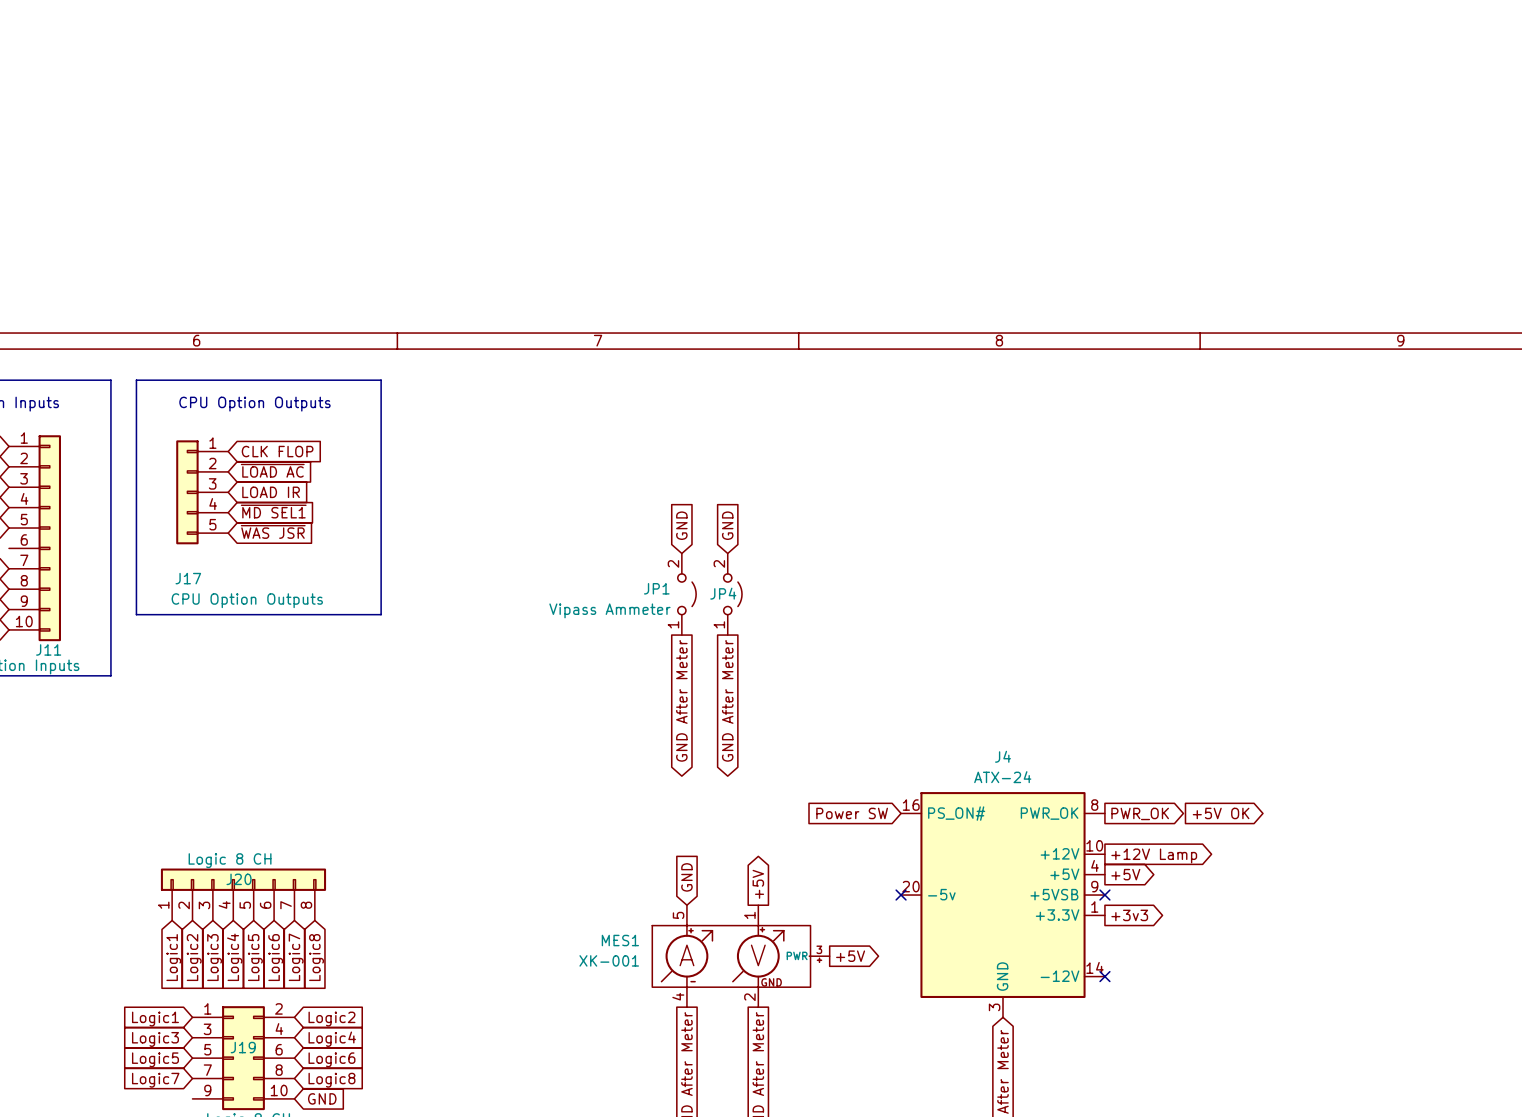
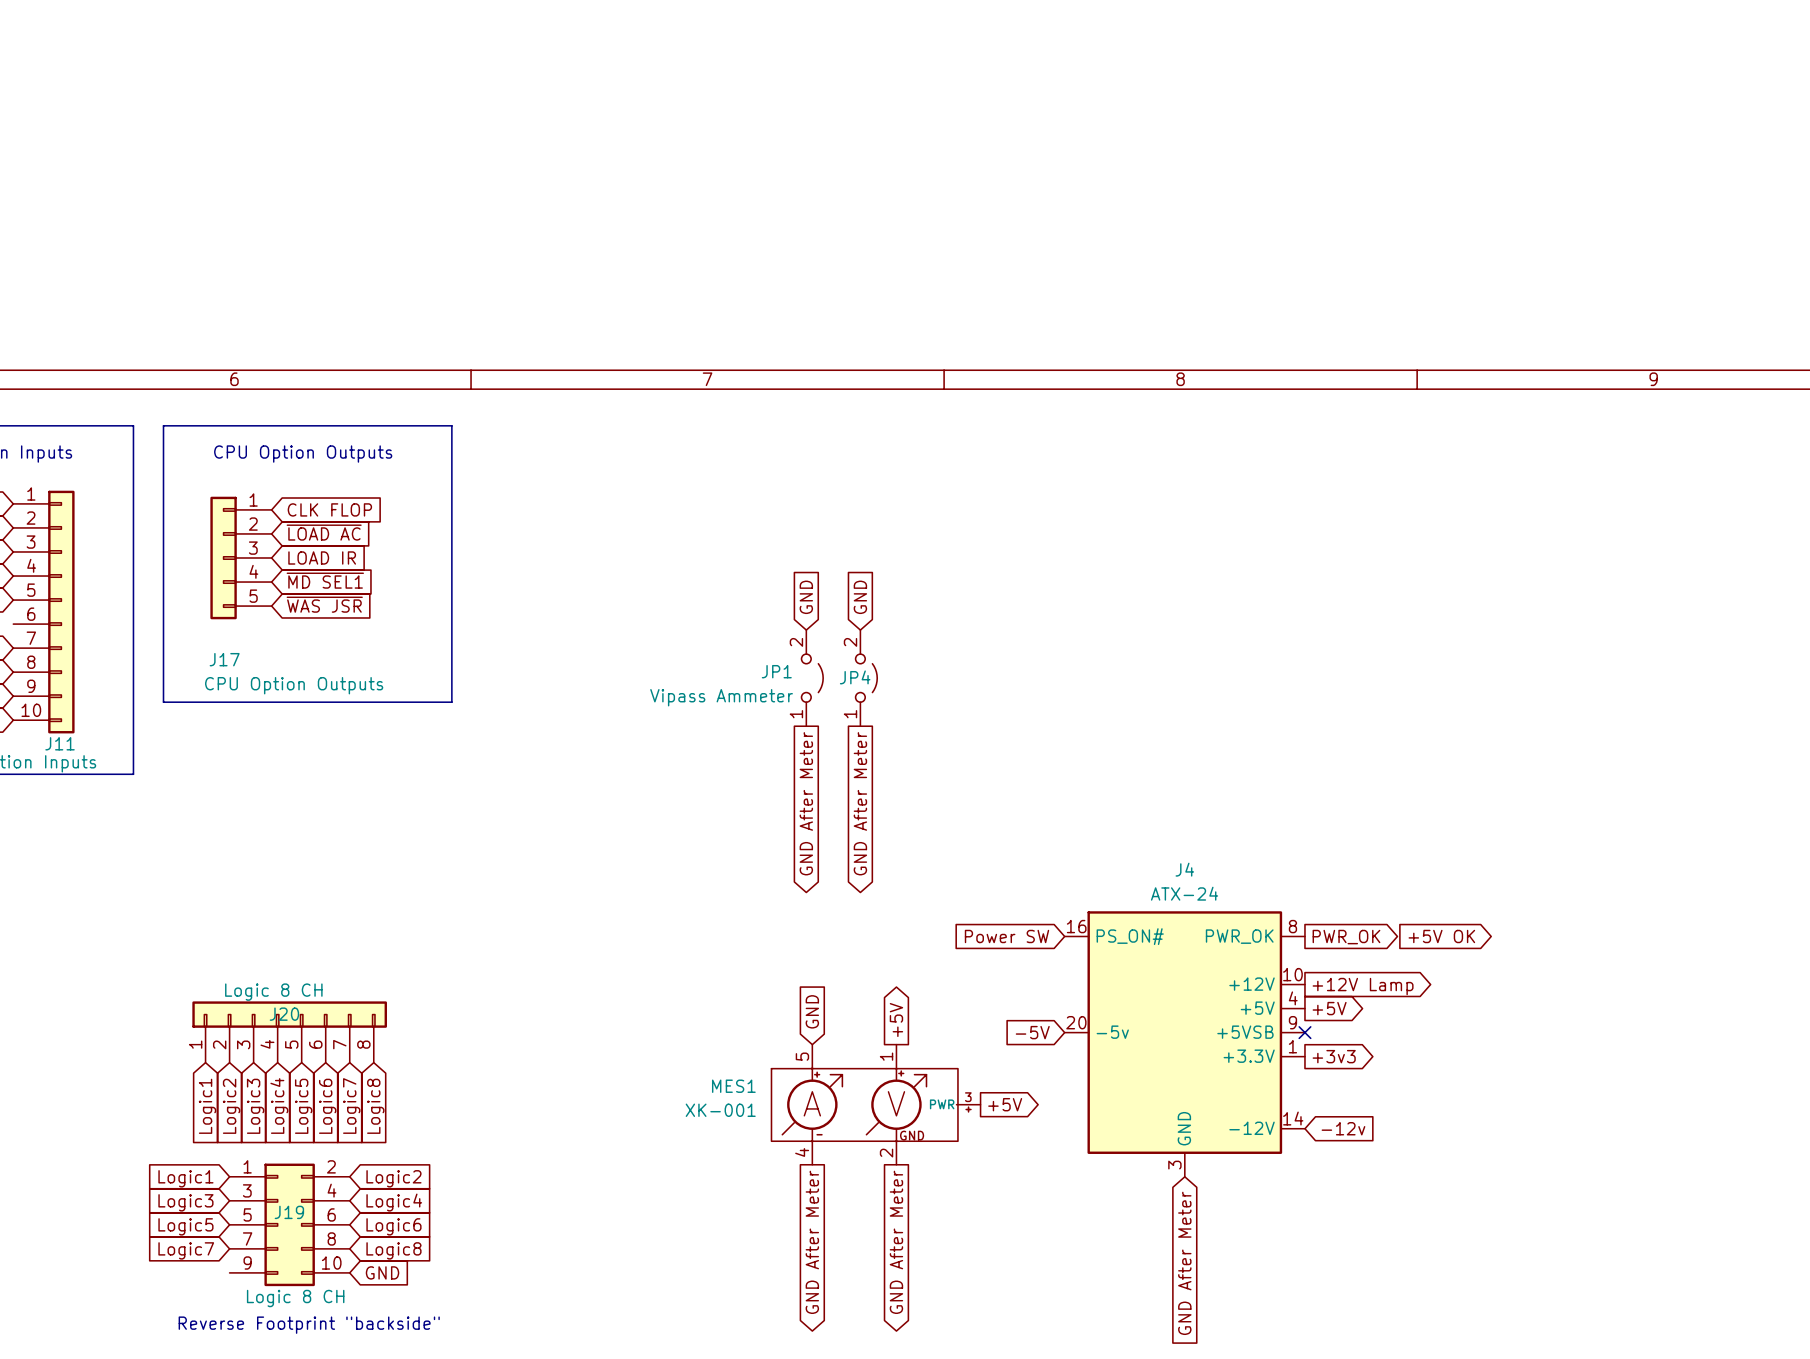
global label: none -> -5V (1032, 1032)
no-connect mark: (901, 895) -> none
no-connect mark: (1104, 976) -> none
global label: none -> -12v (1343, 1128)

